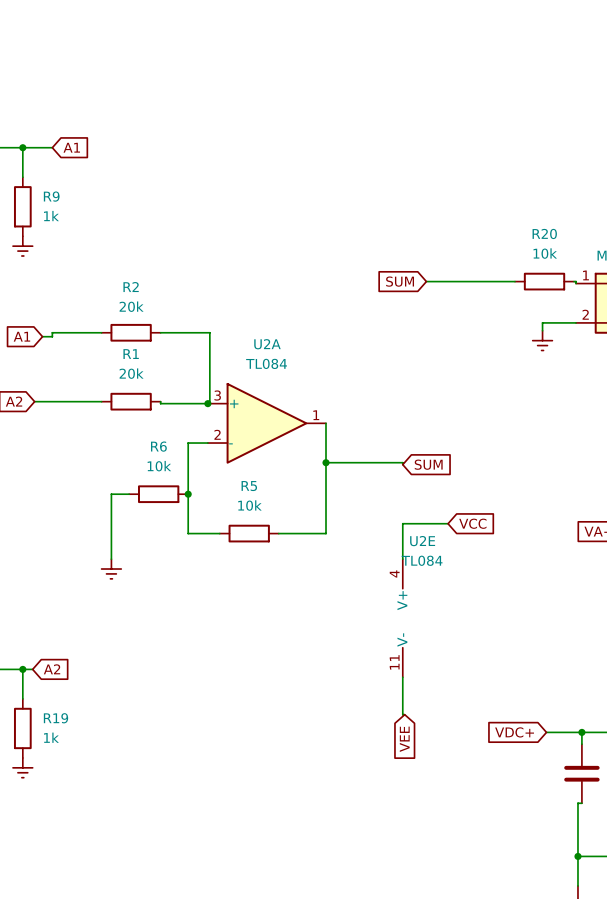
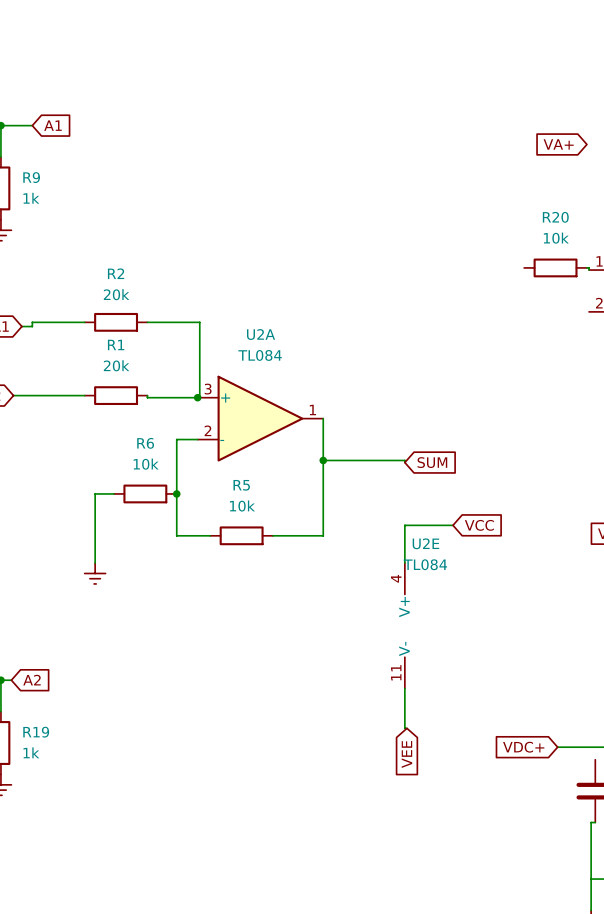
global label: none -> VA+ (558, 144)
global label: SUM (400, 281) -> none
wire: (426, 281) (514, 281) -> none
wire: (576, 322) (542, 322) (542, 330) -> none
power symbol: (542, 340) -> none
wire: (581, 732) (581, 744) -> none
junction: (581, 732) -> none
junction: (577, 856) -> none

